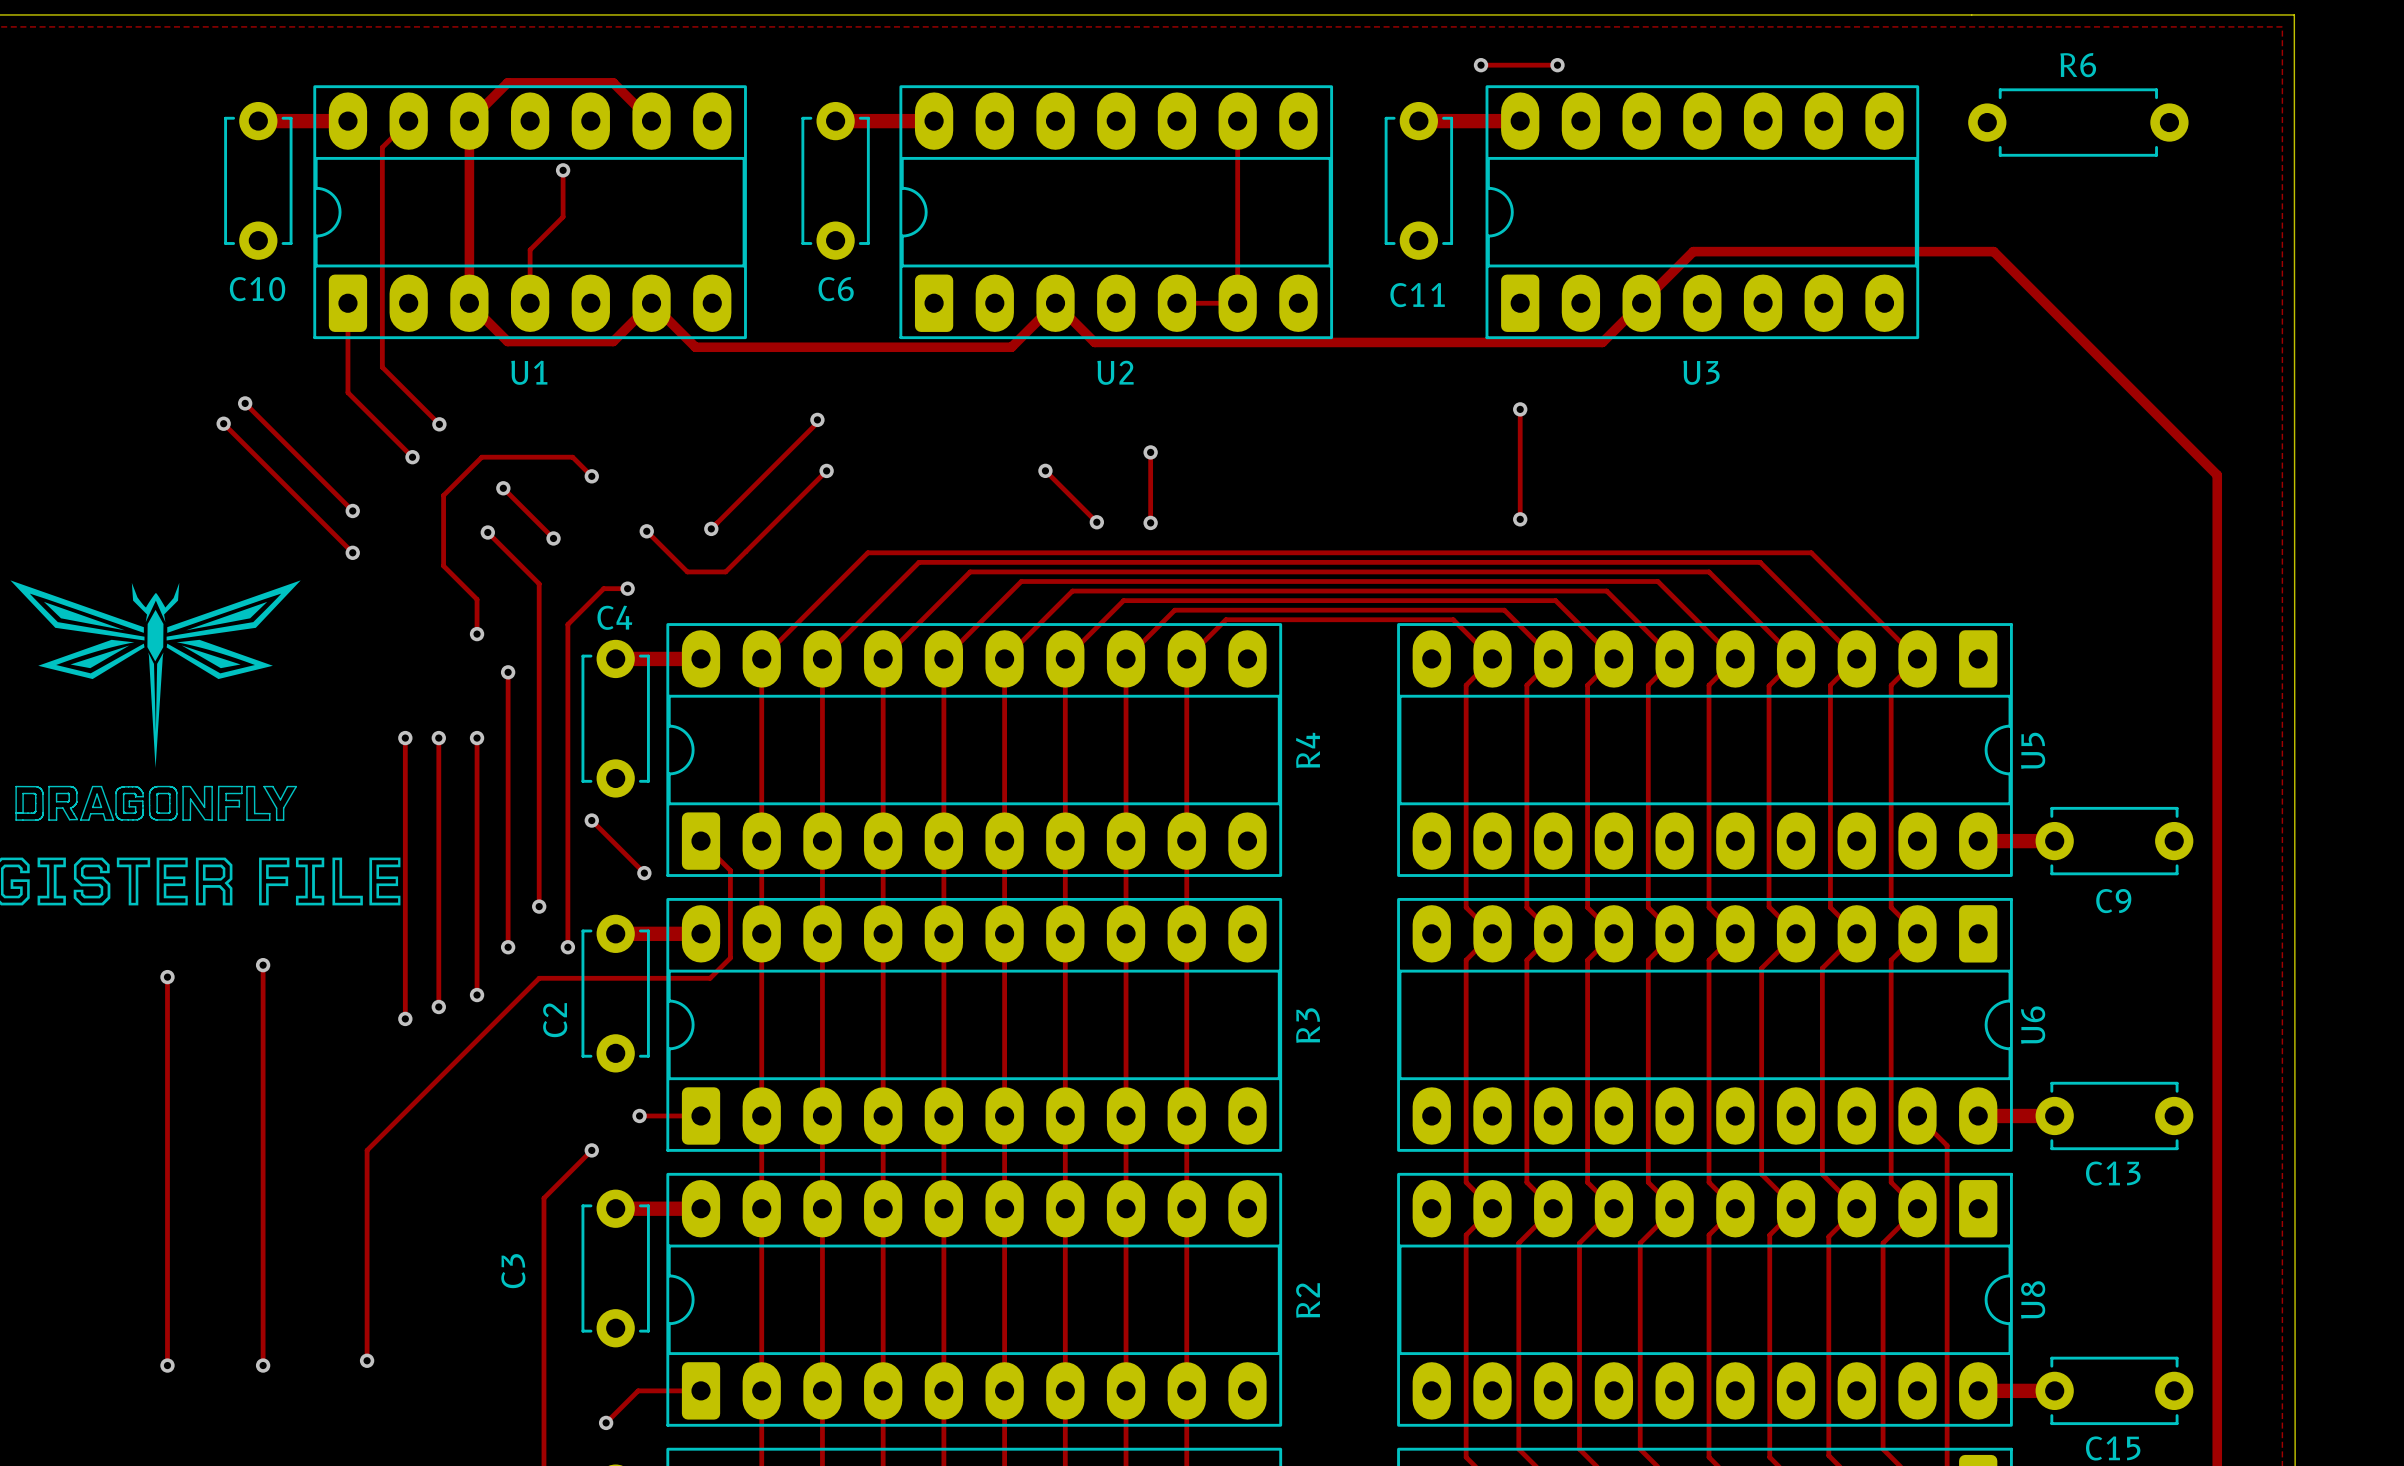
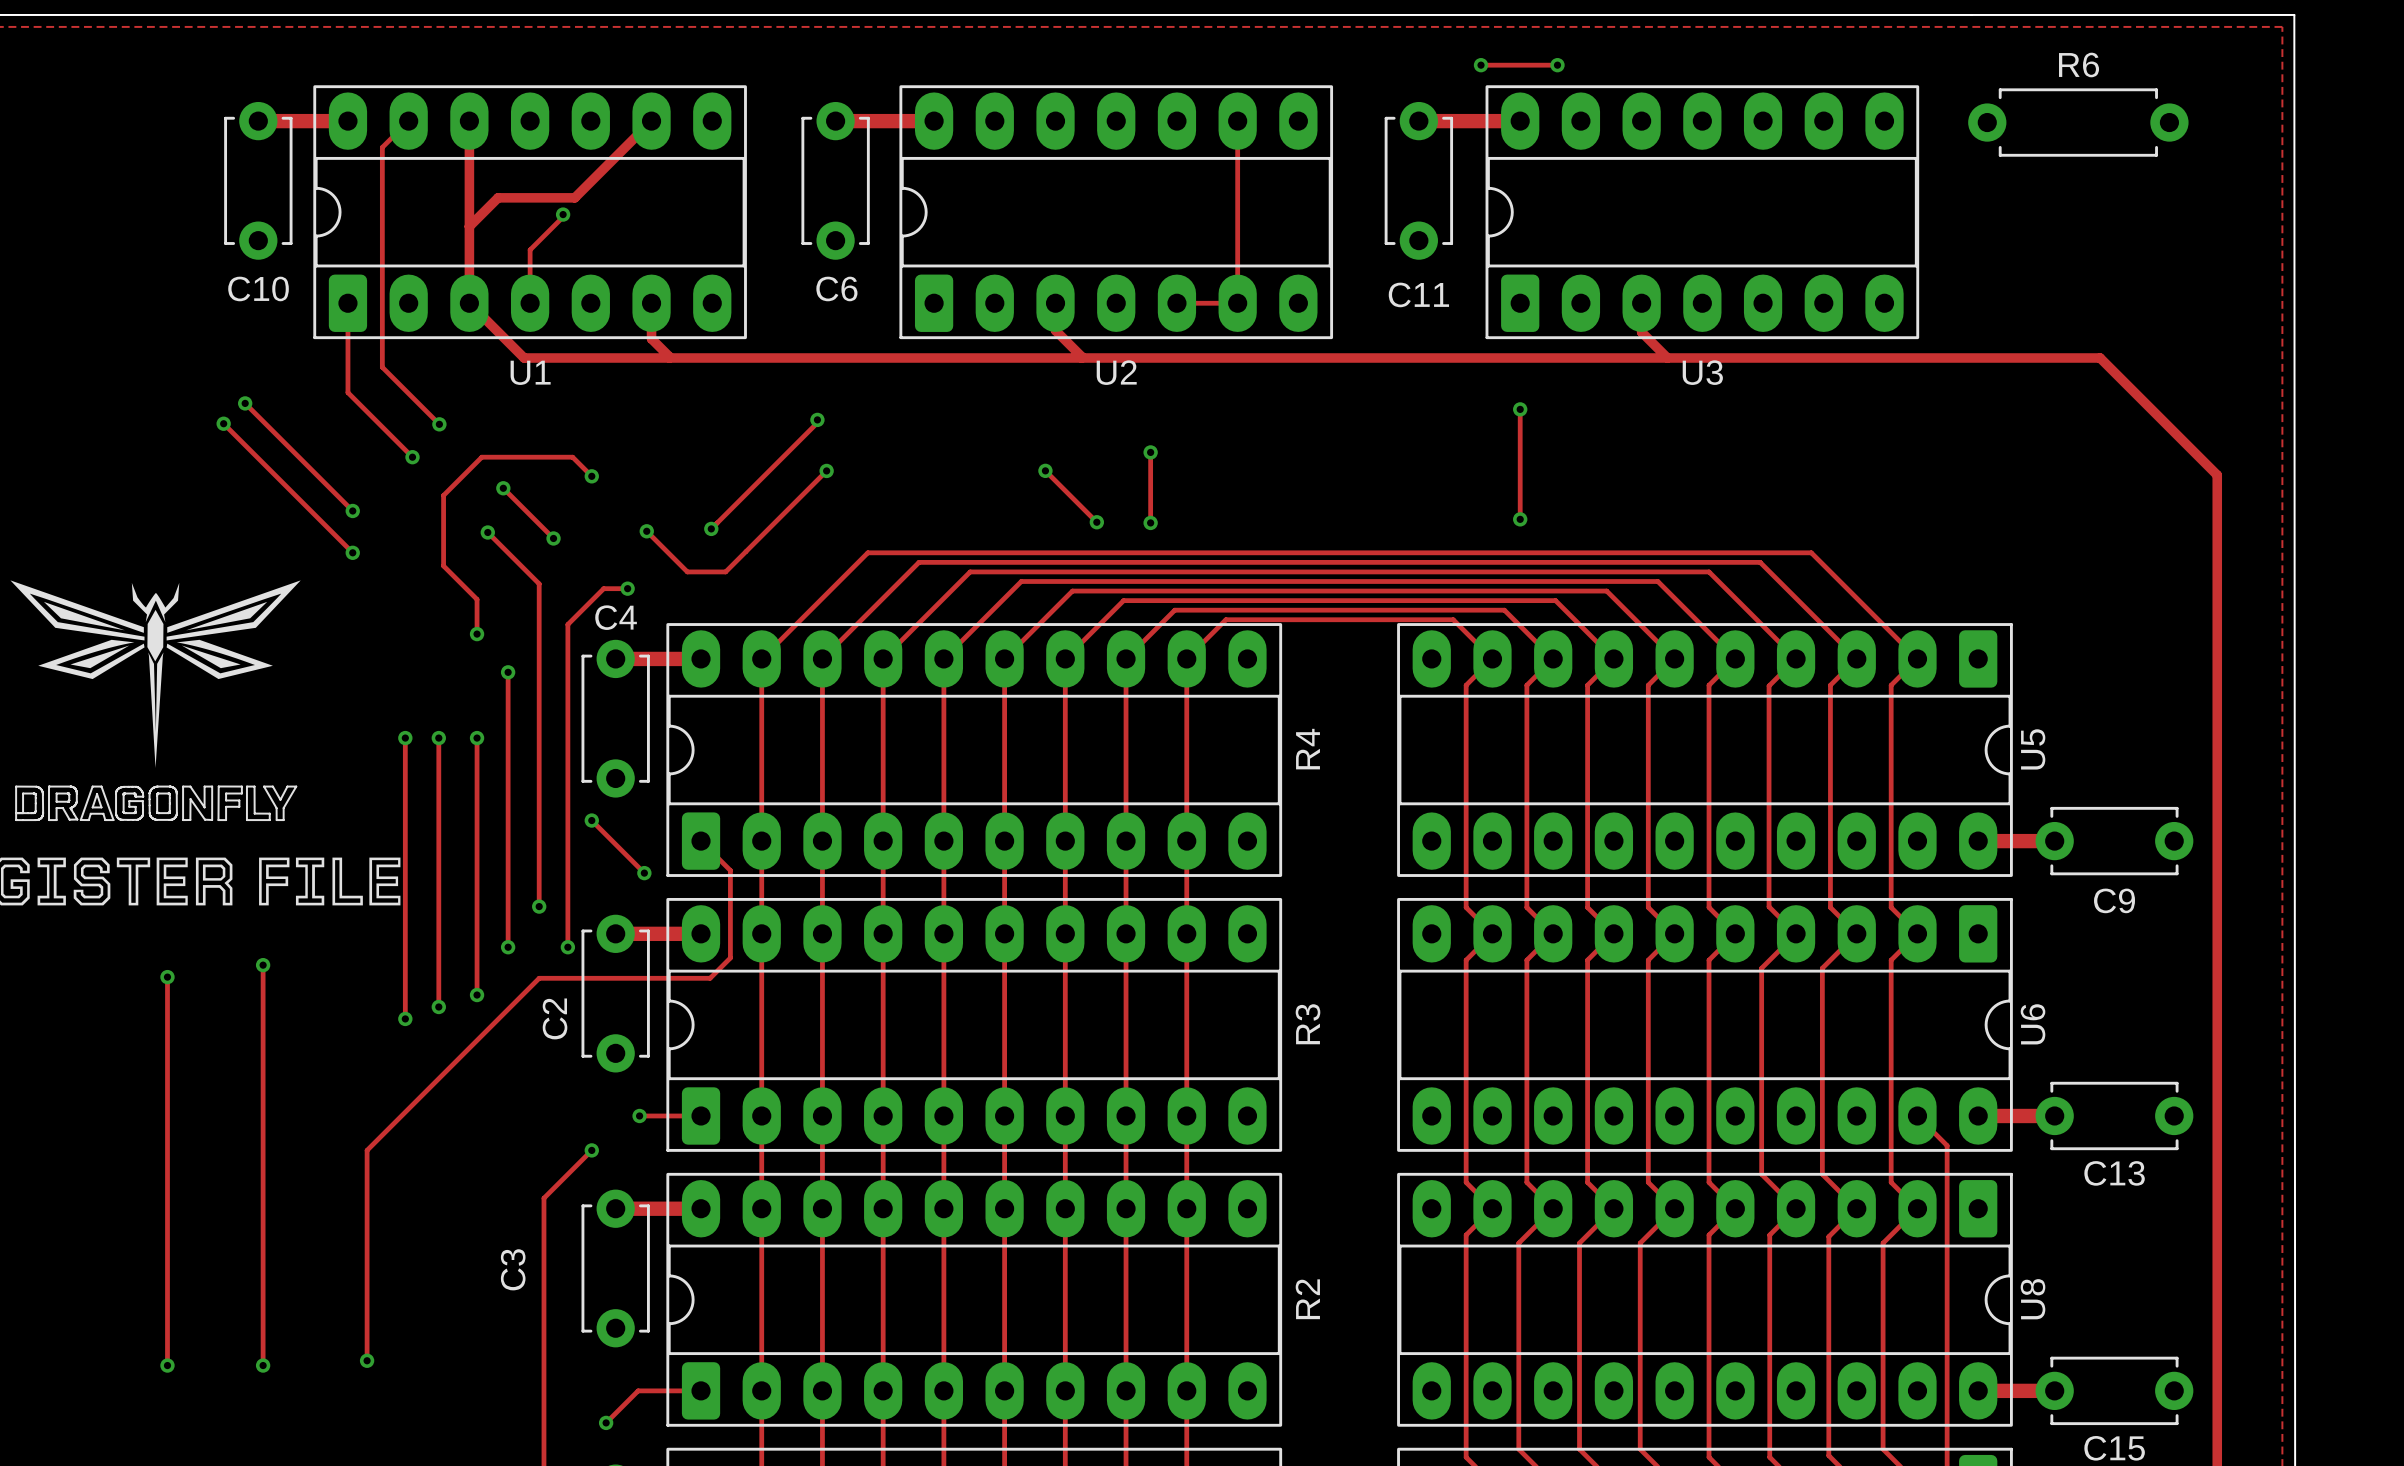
track: (469, 121) (507, 82) (613, 82) (651, 121) -> (469, 226) (498, 197) (574, 197) (651, 121)
track: (563, 170) (563, 214) -> none
via position: (563, 170) -> (563, 214)
track: none -> (651, 303) (651, 338) (669, 358)
track: none -> (1055, 303) (1055, 330) (1081, 358)
track: none -> (1641, 303) (1641, 332) (1667, 358)
track: (507, 341) (613, 341) (651, 303) (695, 347) (1011, 347) (1055, 303) (1094, 342) (1602, 342) (1693, 251) (1993, 251) (2100, 358) -> (507, 341) (524, 358) (2100, 358)

